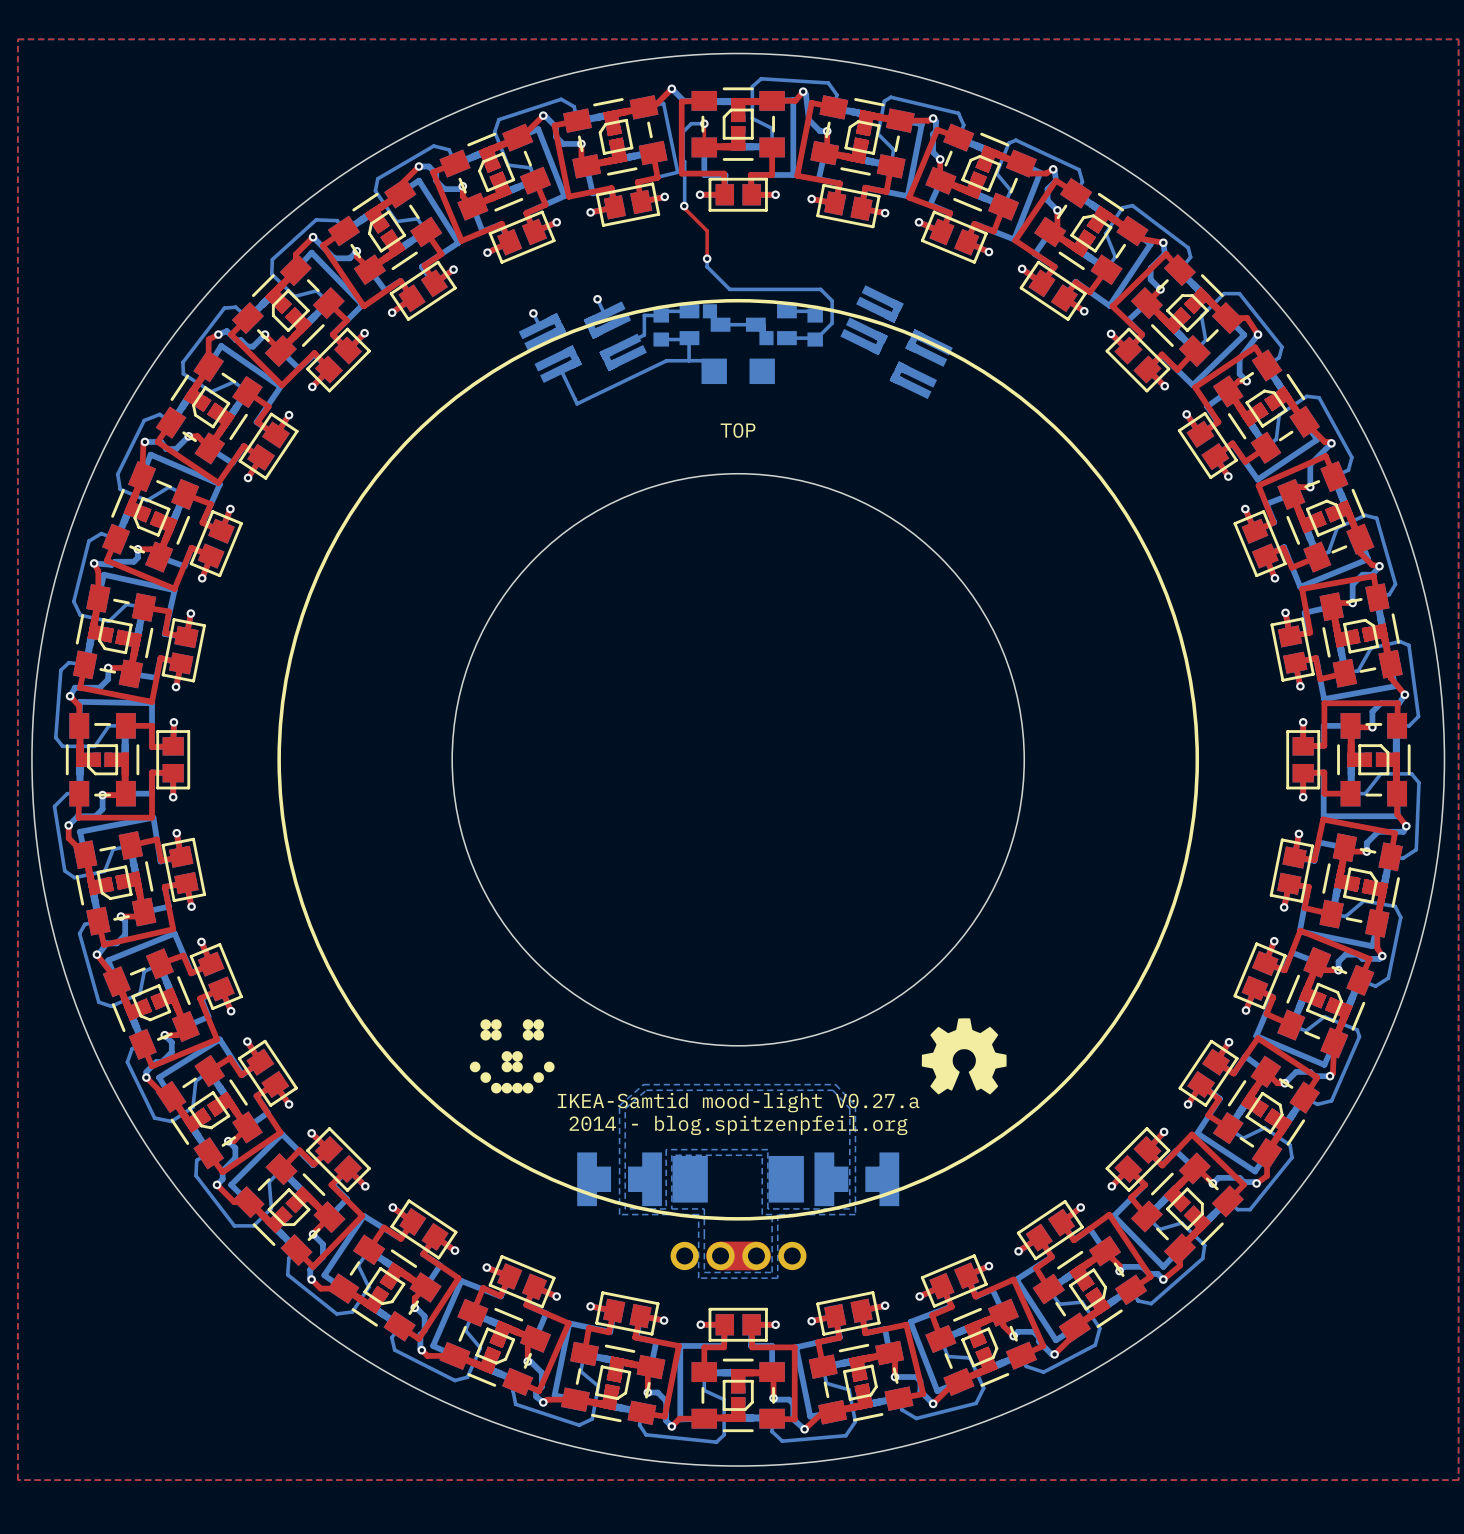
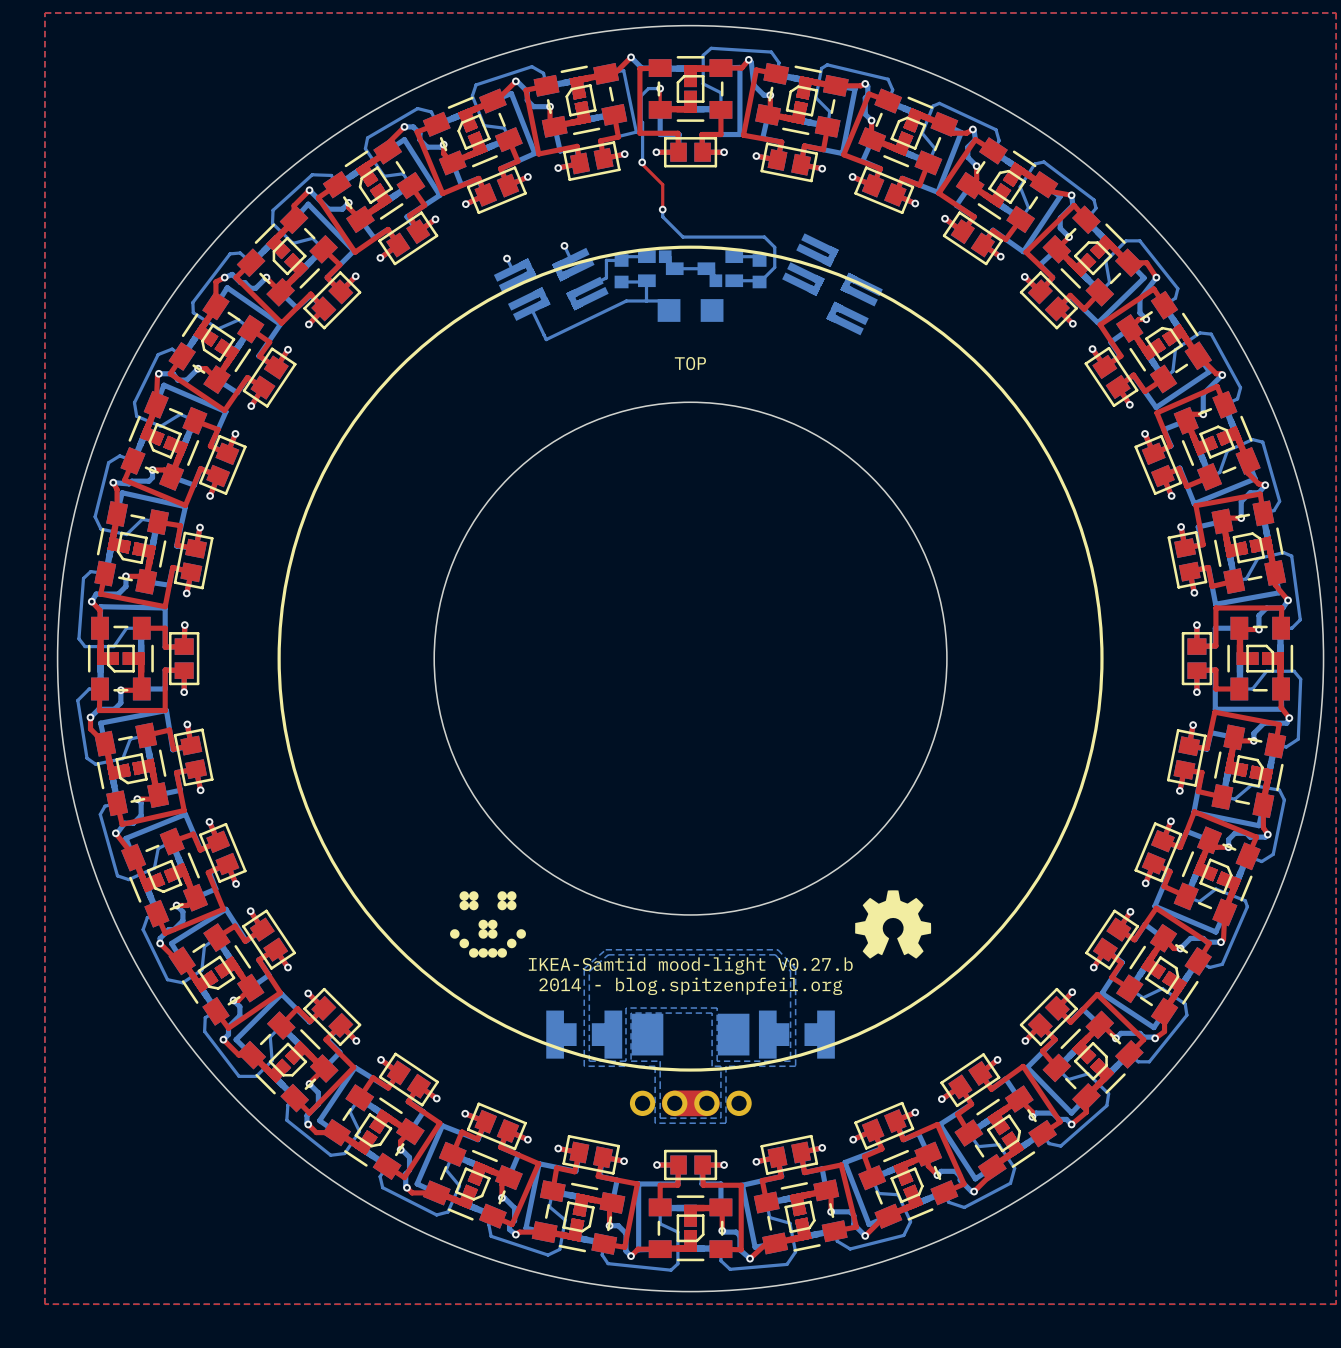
text: IKEA-Samtid mood-light V0.27.a (738, 1102) -> IKEA-Samtid mood-light V0.27.b (690, 965)

